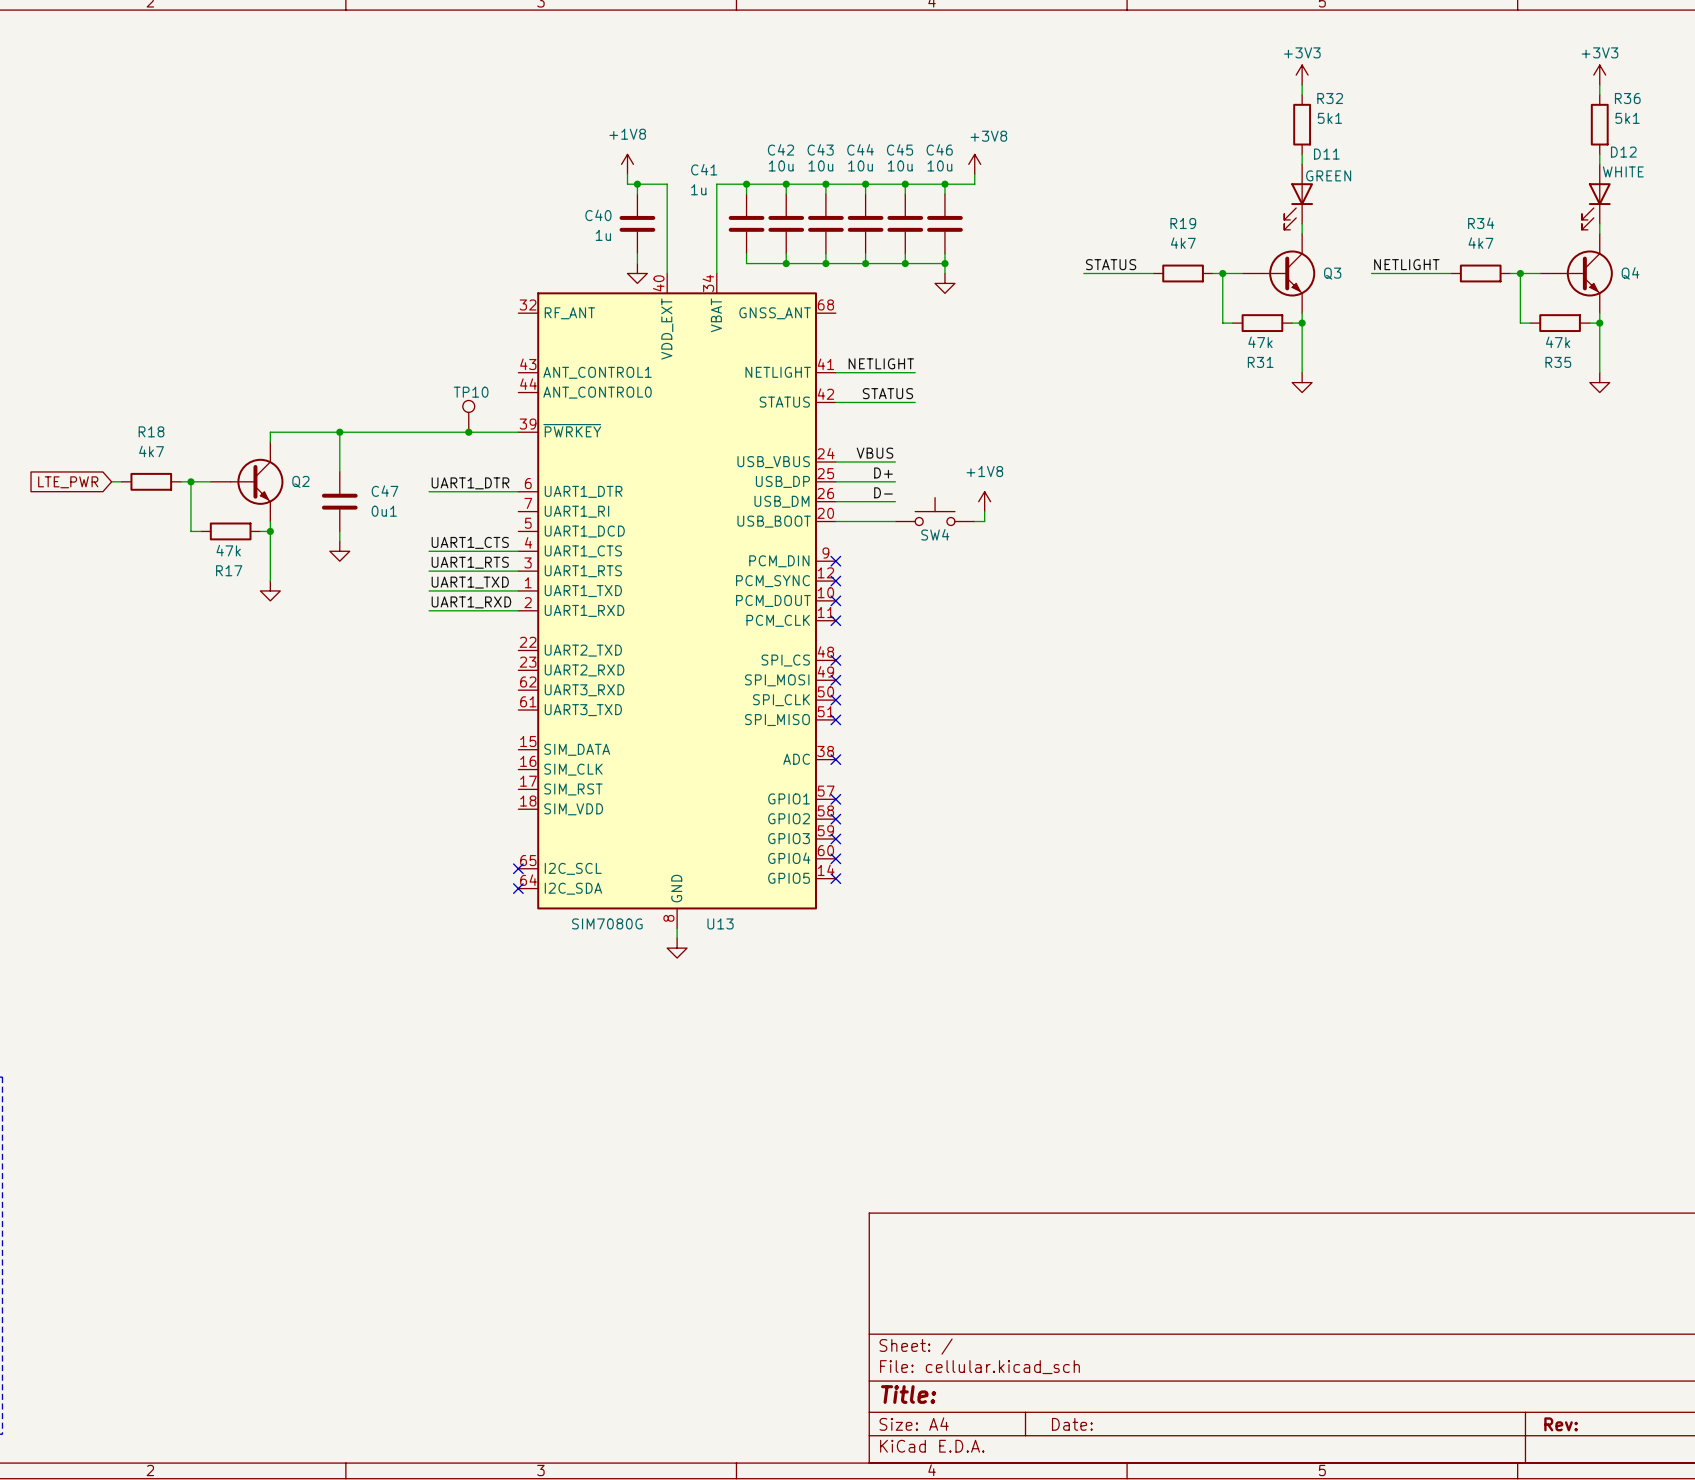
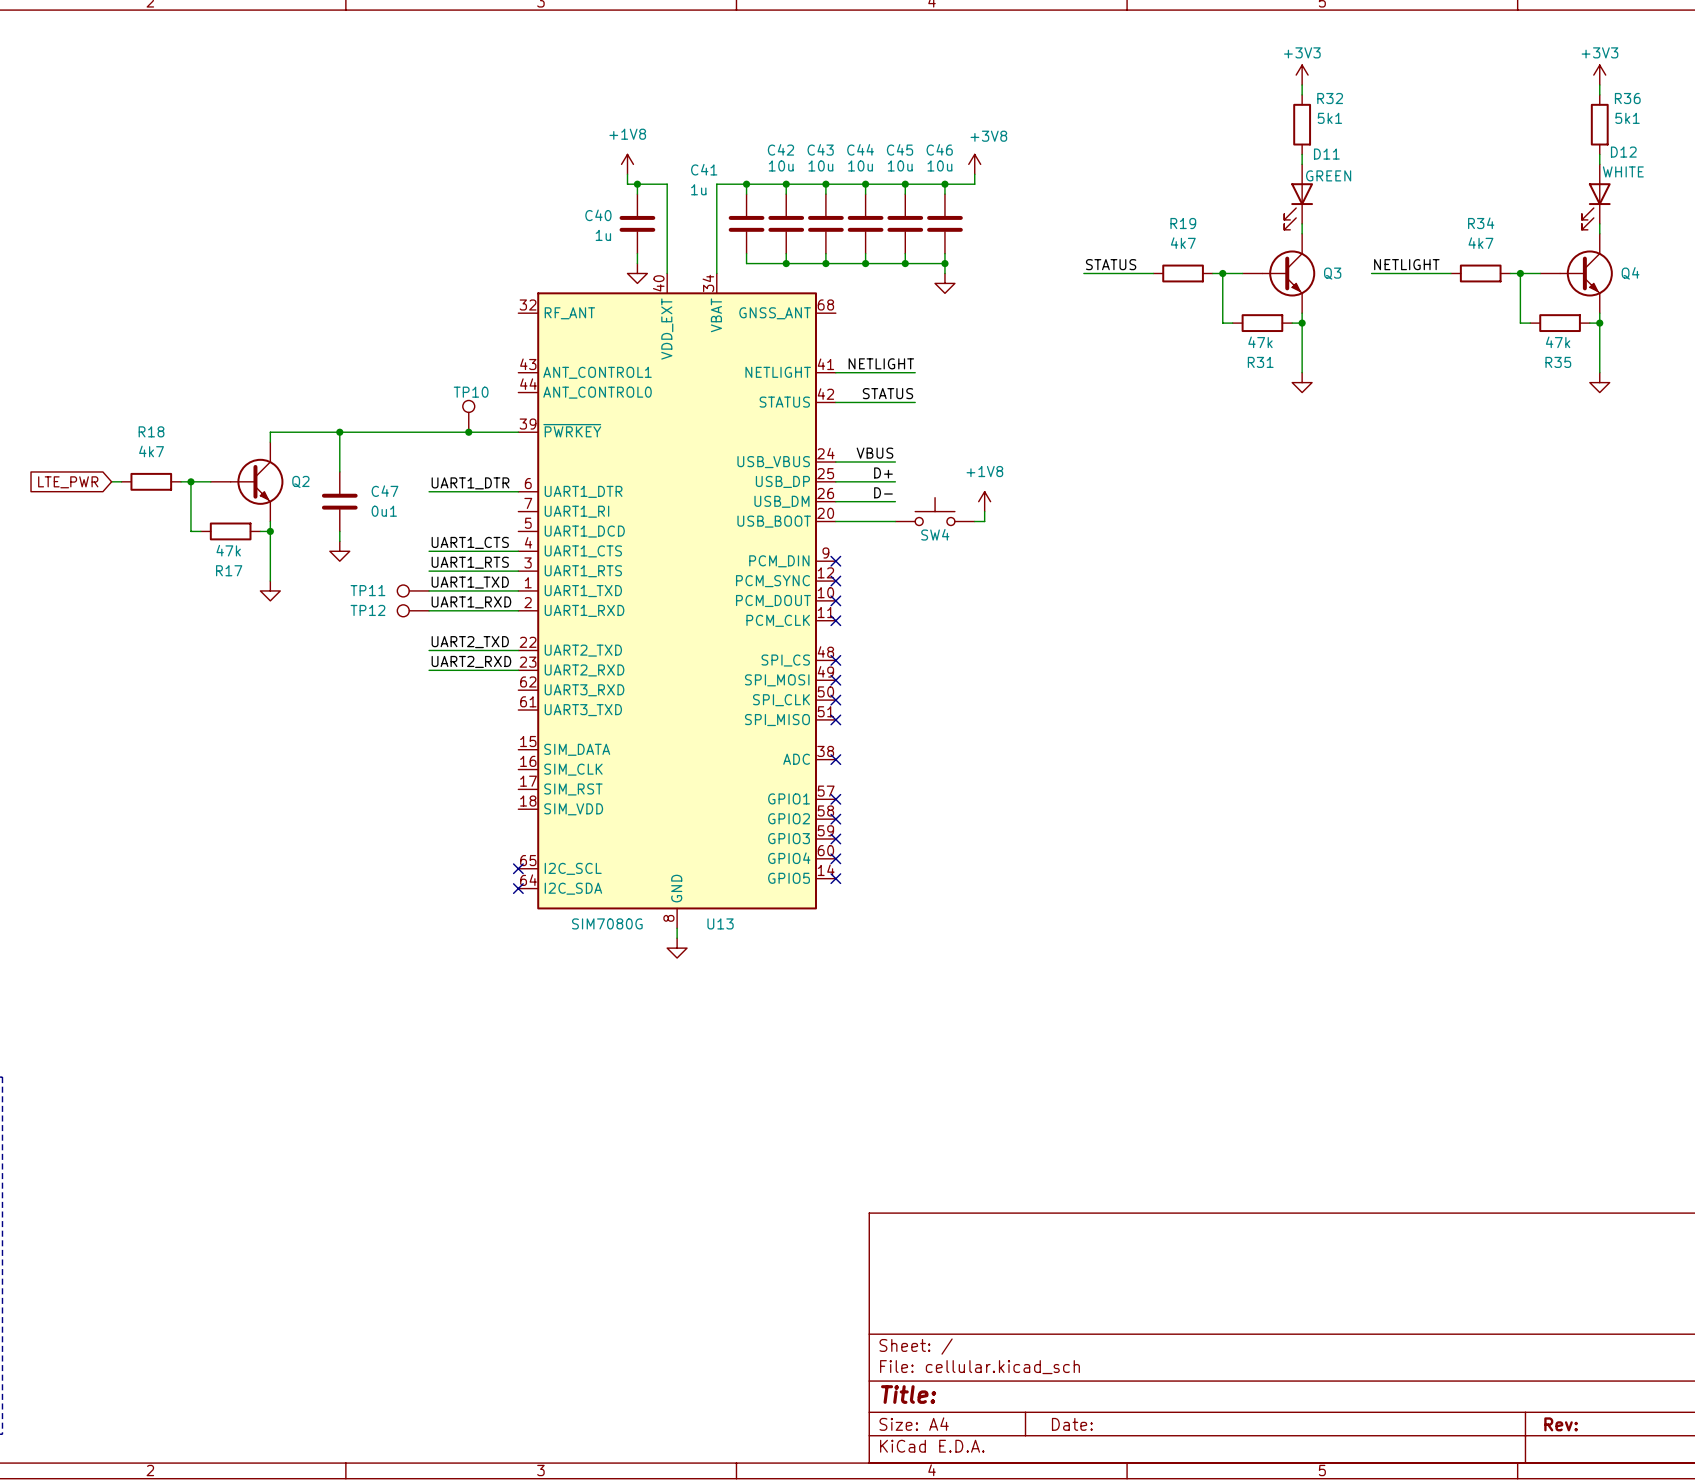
TP11: none -> (413, 590)
TP12: none -> (413, 610)
label: none -> UART2_TXD (470, 642)
wire: none -> (429, 650) (518, 650)
label: none -> UART2_RXD (471, 661)
wire: none -> (429, 670) (518, 670)

